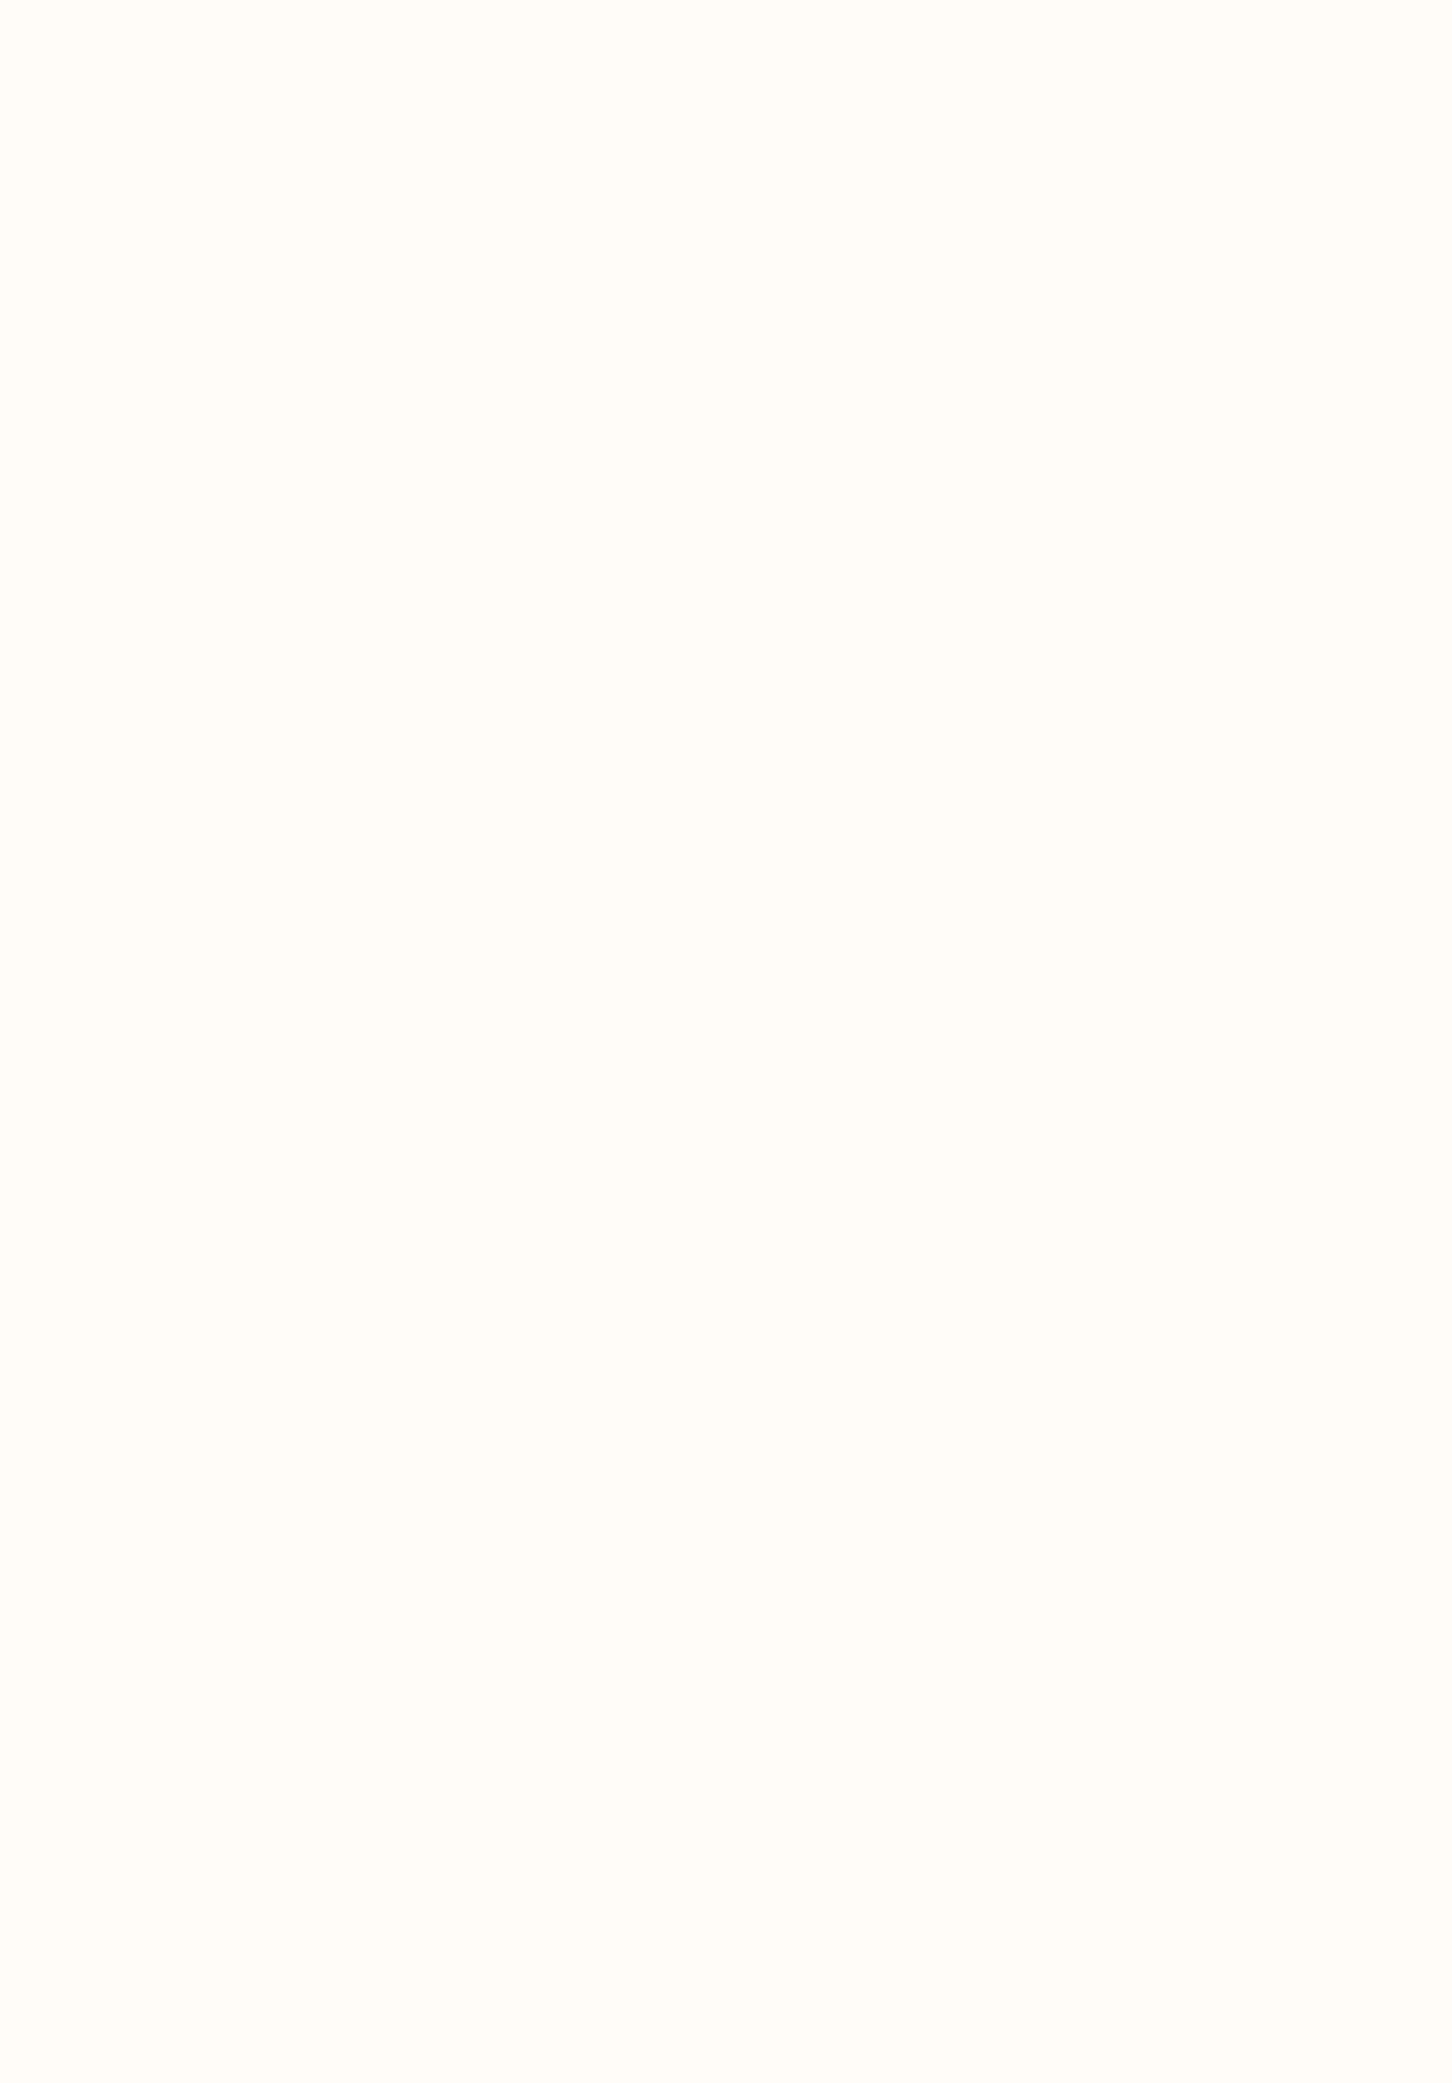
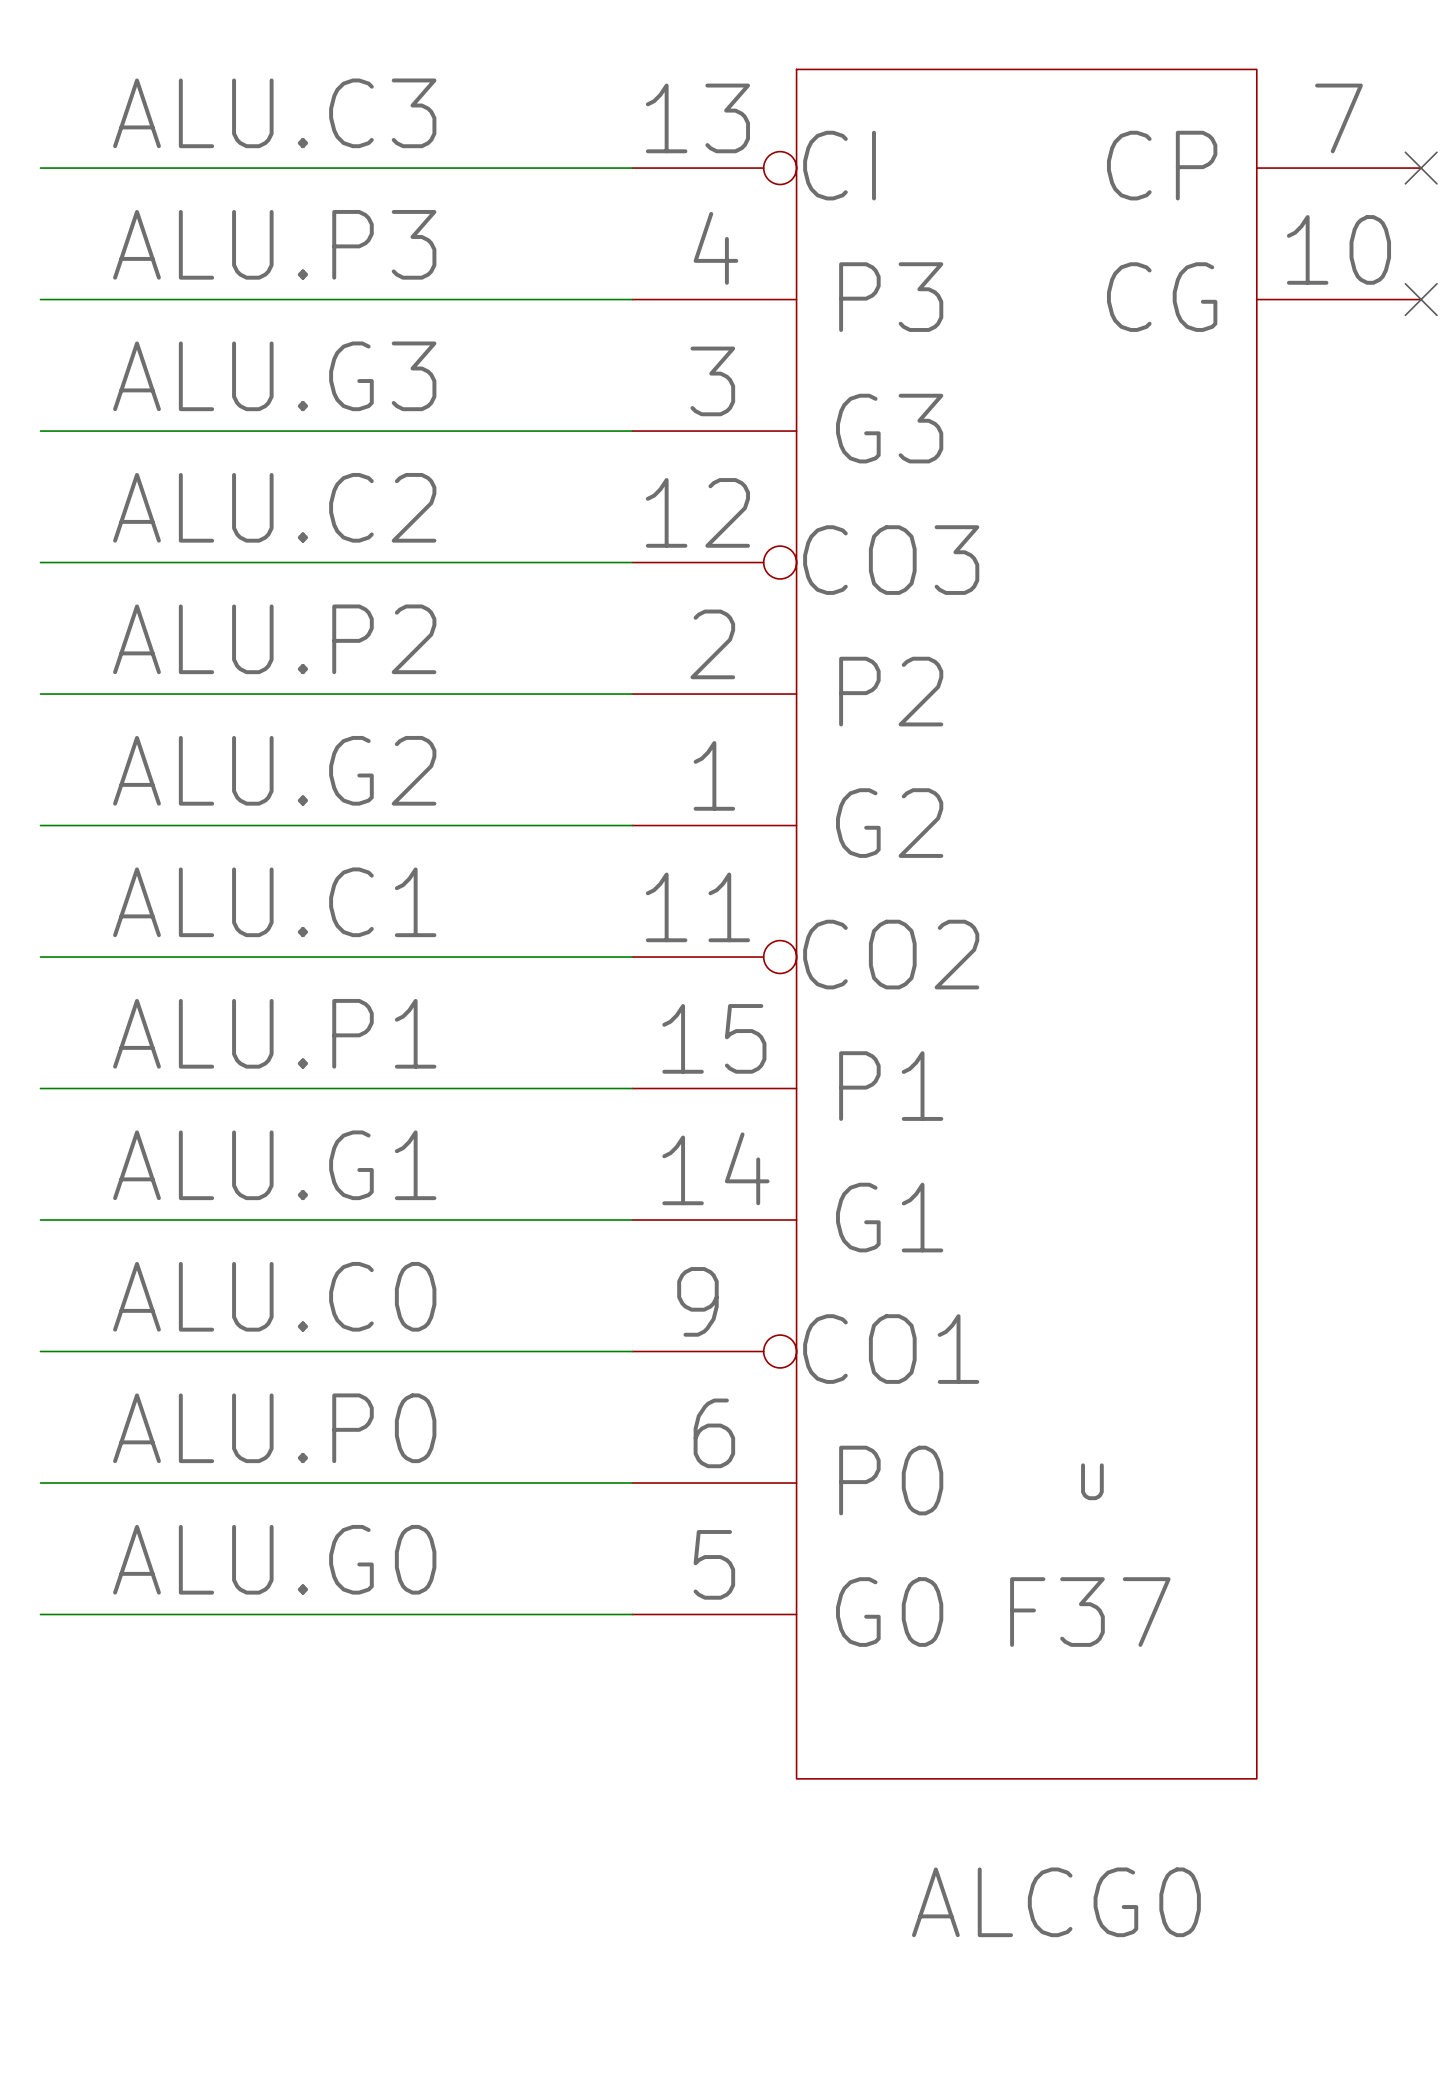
label: none -> ALU.C3 (274, 113)
wire: none -> (40, 168) (632, 168)
no-connect mark: none -> (1421, 168)
label: none -> ALU.P3 (274, 244)
wire: none -> (40, 299) (632, 299)
no-connect mark: none -> (1421, 299)
label: none -> ALU.G3 (274, 376)
wire: none -> (40, 431) (632, 431)
label: none -> ALU.C2 (274, 507)
wire: none -> (40, 562) (632, 562)
label: none -> ALU.P2 (274, 639)
wire: none -> (40, 694) (632, 694)
label: none -> ALU.G2 (274, 770)
wire: none -> (40, 825) (632, 825)
label: none -> ALU.C1 (274, 902)
U: none -> (1026, 924)
wire: none -> (40, 957) (632, 957)
label: none -> ALU.P1 (274, 1033)
wire: none -> (40, 1088) (632, 1088)
label: none -> ALU.G1 (274, 1165)
wire: none -> (40, 1220) (632, 1220)
label: none -> ALU.C0 (274, 1296)
wire: none -> (40, 1351) (632, 1351)
label: none -> ALU.P0 (274, 1428)
wire: none -> (40, 1483) (632, 1483)
label: none -> ALU.G0 (274, 1559)
wire: none -> (40, 1614) (632, 1614)

